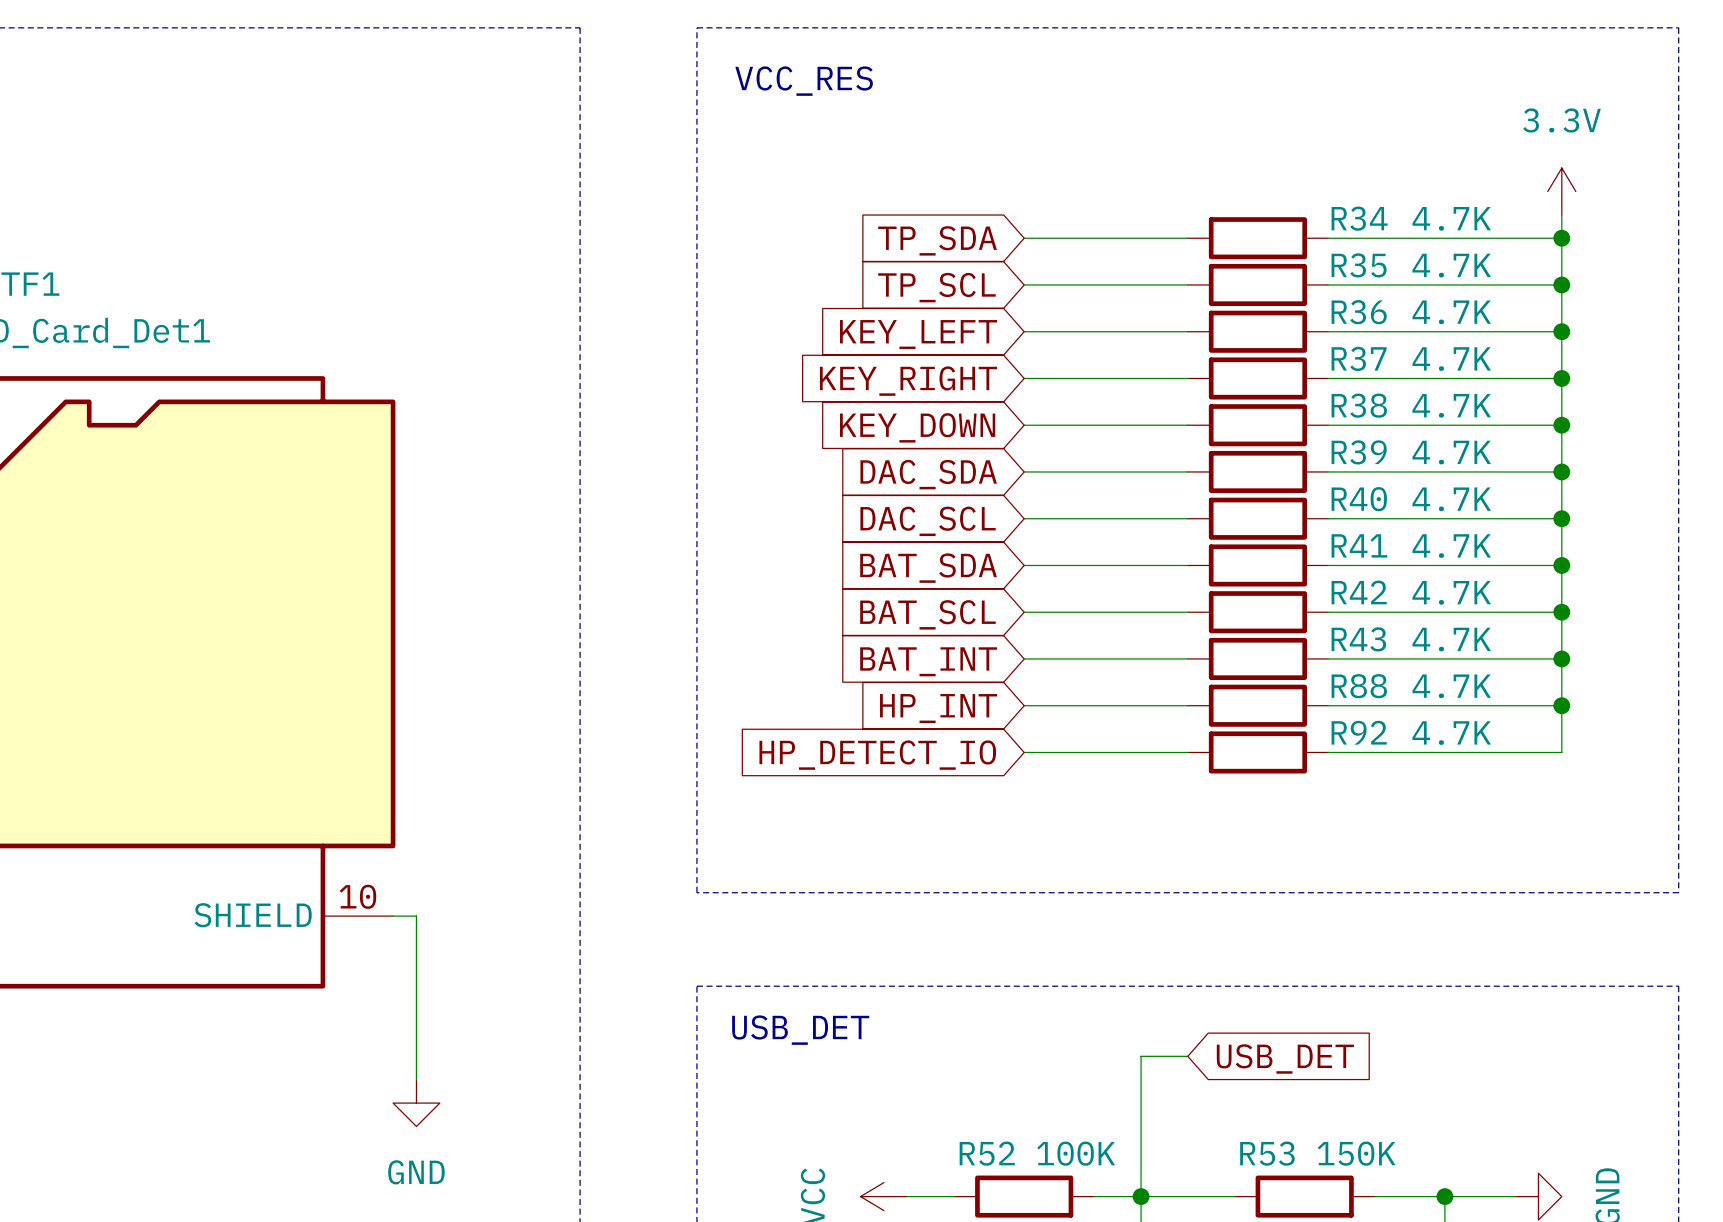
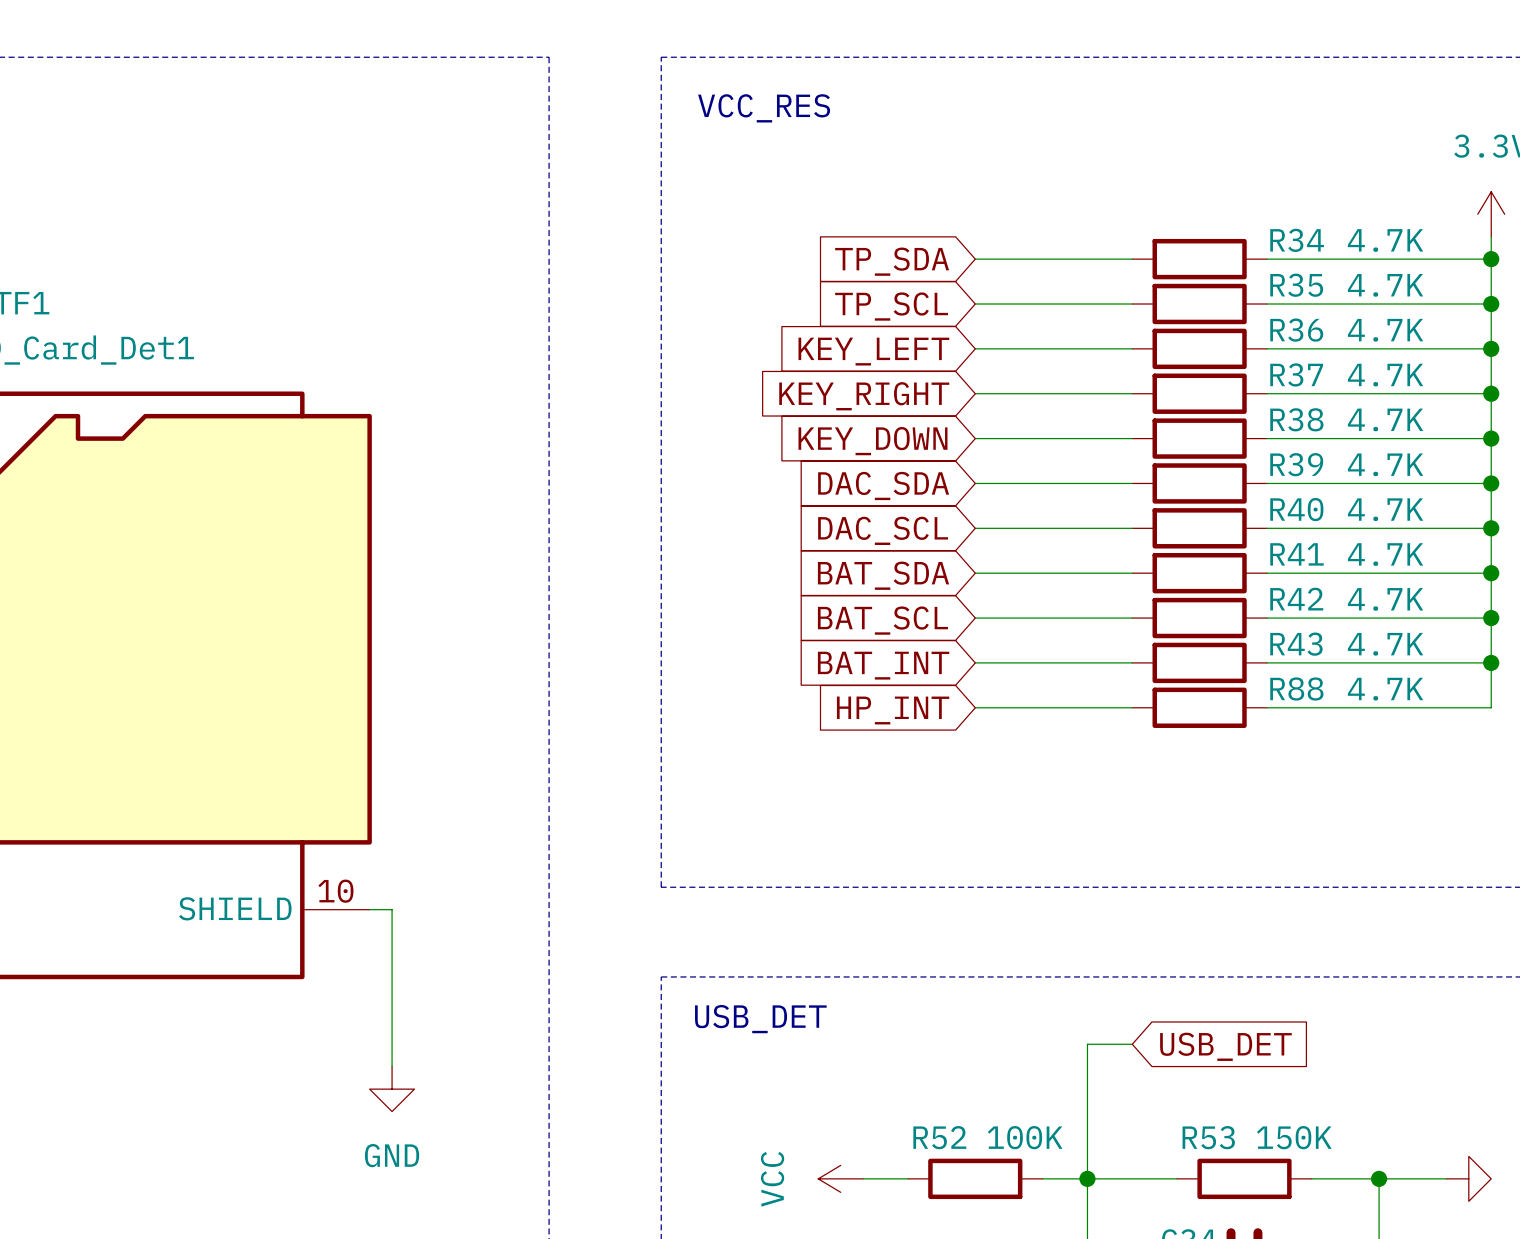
wire: (1561, 705) (1561, 752) (1328, 752) -> none
junction: (1561, 705) -> none
wire: (1024, 752) (1187, 752) -> none
R92: 4.7K (1257, 752) -> none
global label: HP_DETECT_IO (877, 755) -> none

